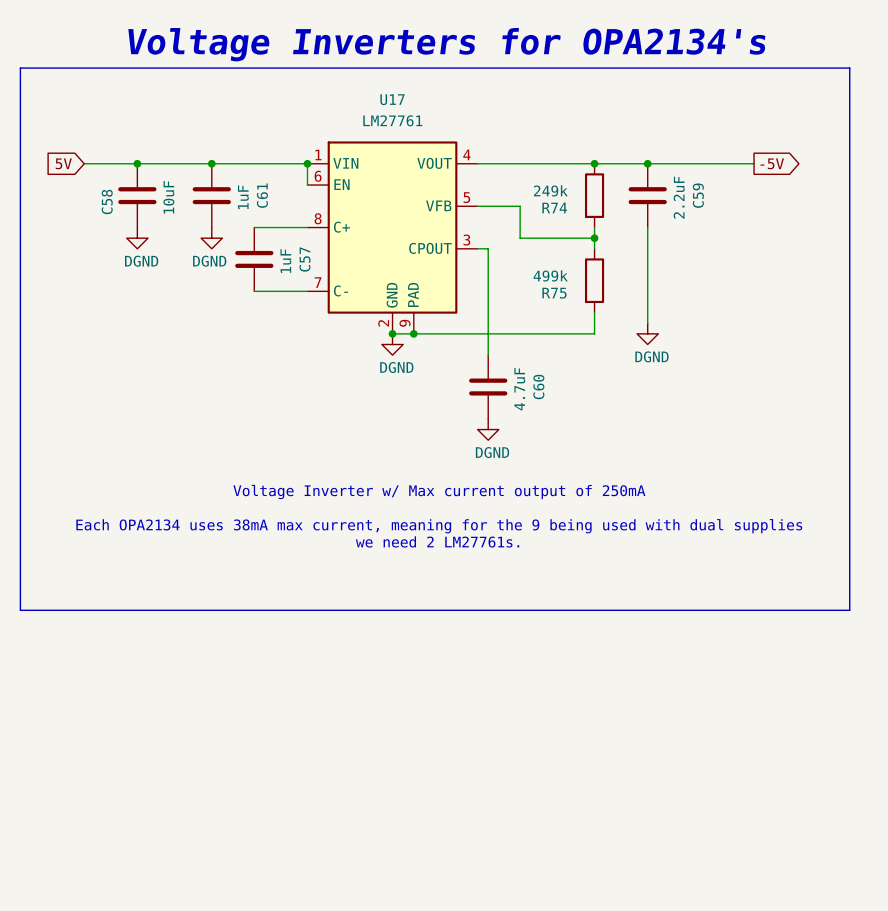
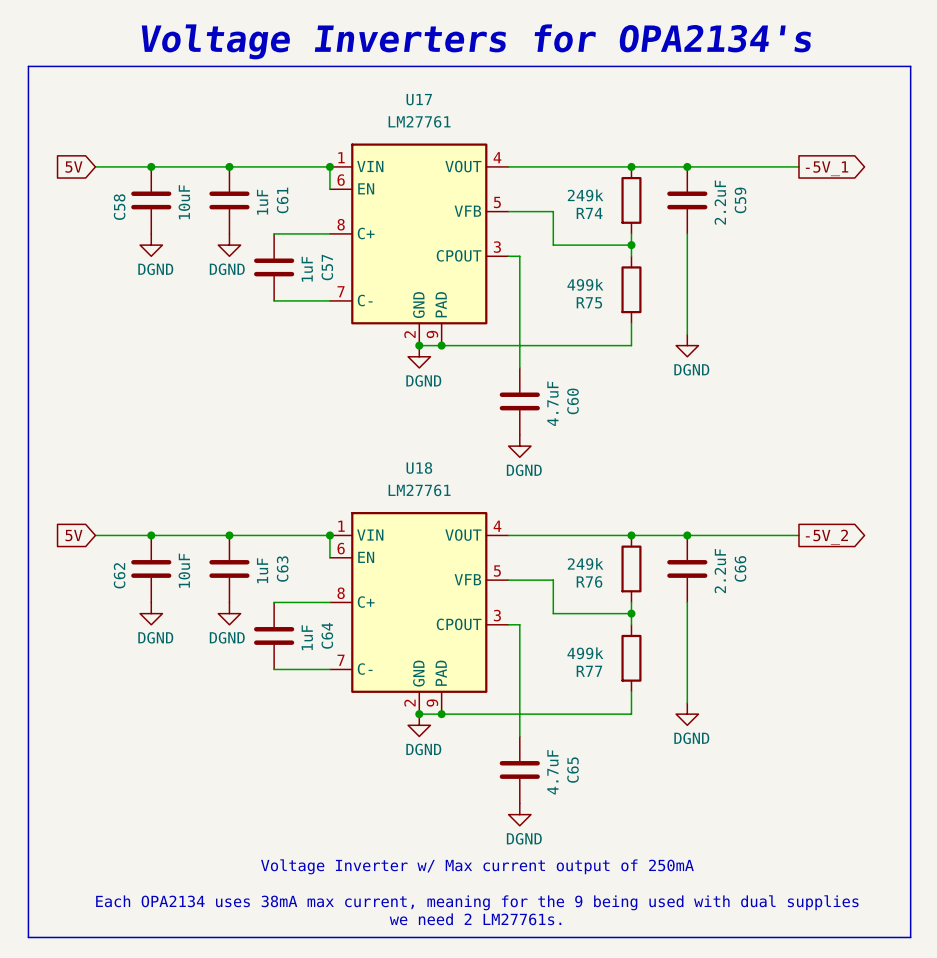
line: (849, 68) (849, 610) (20, 610) -> (899, 66) (910, 66) (910, 937) (28, 937) (28, 635)
global label: -5V (772, 163) -> -5V_1 (827, 168)
text: Voltage Inverter w/ Max current output of 250mA (439, 492) -> none
global label: none -> 5V (73, 535)
wire: none -> (95, 535) (329, 535) (329, 557)
junction: none -> (151, 535)
junction: none -> (229, 535)
junction: none -> (329, 535)
wire: none -> (508, 535) (798, 535)
junction: none -> (631, 535)
junction: none -> (687, 535)
global label: none -> -5V_2 (826, 537)
text: Each OPA2134 uses 38mA max current, meaning for the 9 being used with dual supplies (439, 526) -> none
text: we need 2 LM27761s. (437, 541) -> none
C62: none -> 10uF (151, 568)
C63: none -> 1uF (229, 568)
R76: none -> 249k (631, 568)
C66: none -> 2.2uF (687, 568)
wire: none -> (508, 580) (553, 580) (553, 613) (631, 613)
wire: none -> (274, 602) (329, 602)
wire: none -> (631, 602) (631, 624)
wire: none -> (687, 602) (687, 702)
U18: none -> LM27761 (419, 613)
power symbol: none -> DGND (151, 613)
power symbol: none -> DGND (229, 613)
junction: none -> (631, 613)
wire: none -> (508, 624) (519, 624) (519, 736)
C64: none -> 1uF (274, 635)
R77: none -> 499k (631, 658)
wire: none -> (274, 669) (329, 669)
wire: none -> (631, 691) (631, 714) (419, 714)
junction: none -> (419, 714)
junction: none -> (441, 714)
power symbol: none -> DGND (687, 714)
power symbol: none -> DGND (419, 725)
C65: none -> 4.7uF (519, 769)
power symbol: none -> DGND (519, 814)
text: none -> Voltage Inverter w/ Max current output of 250mA (477, 866)
text: none -> Each OPA2134 uses 38mA max current, meaning for the 9 being used with dual supplies (477, 902)
text: none -> we need 2 LM27761s. (475, 919)

